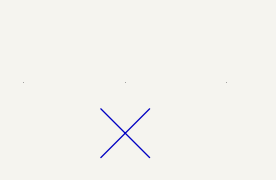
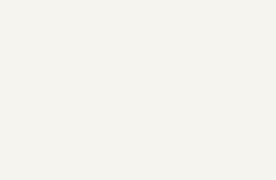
no-connect mark: (125, 133) -> none

